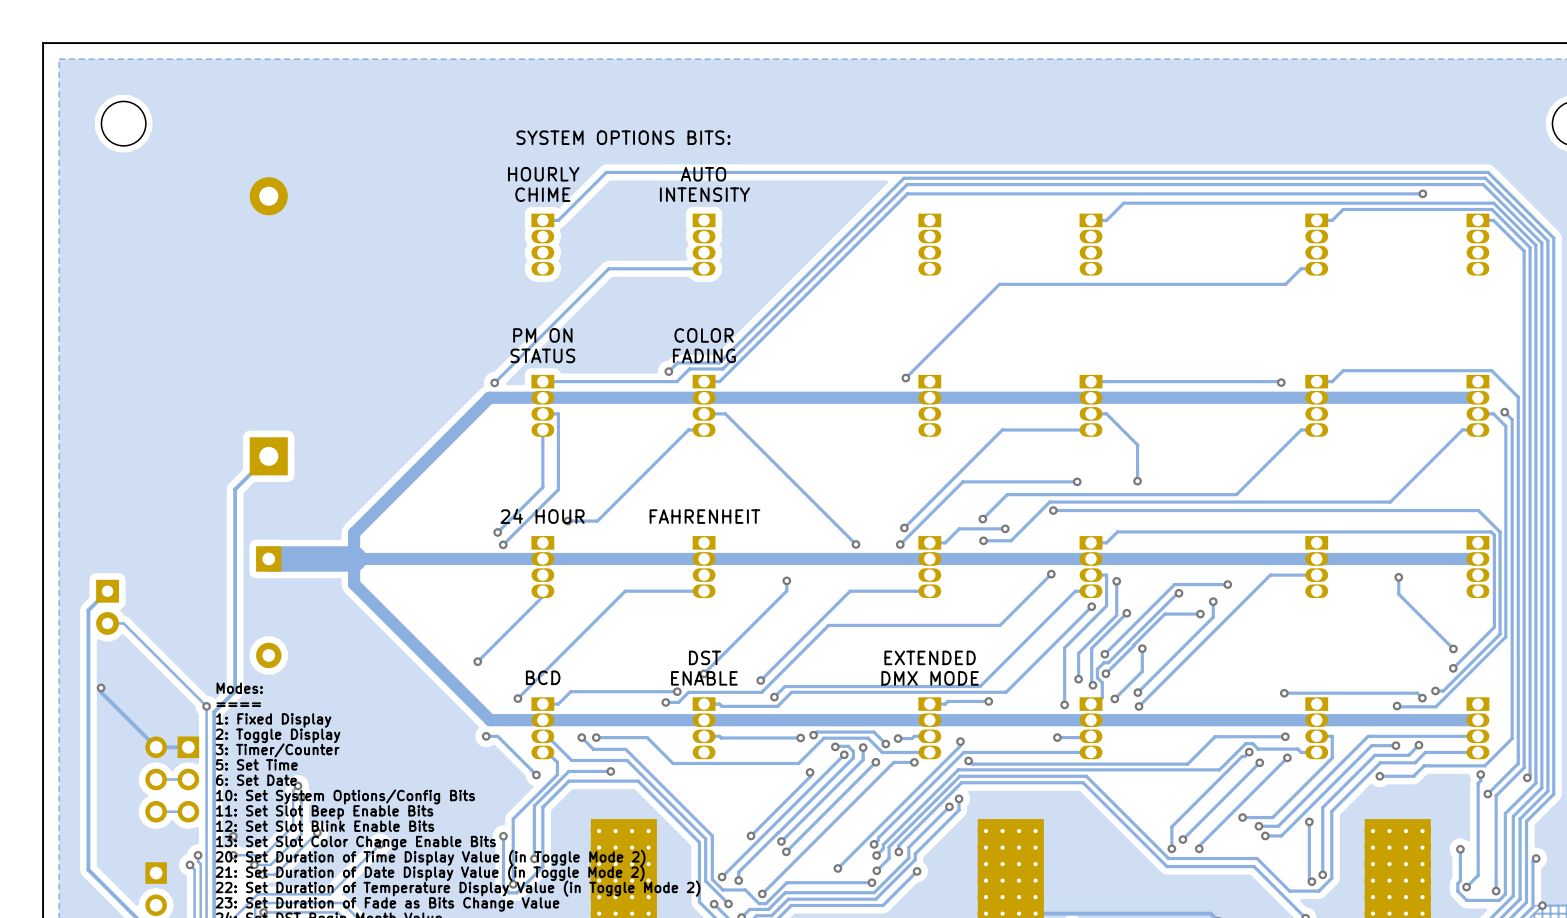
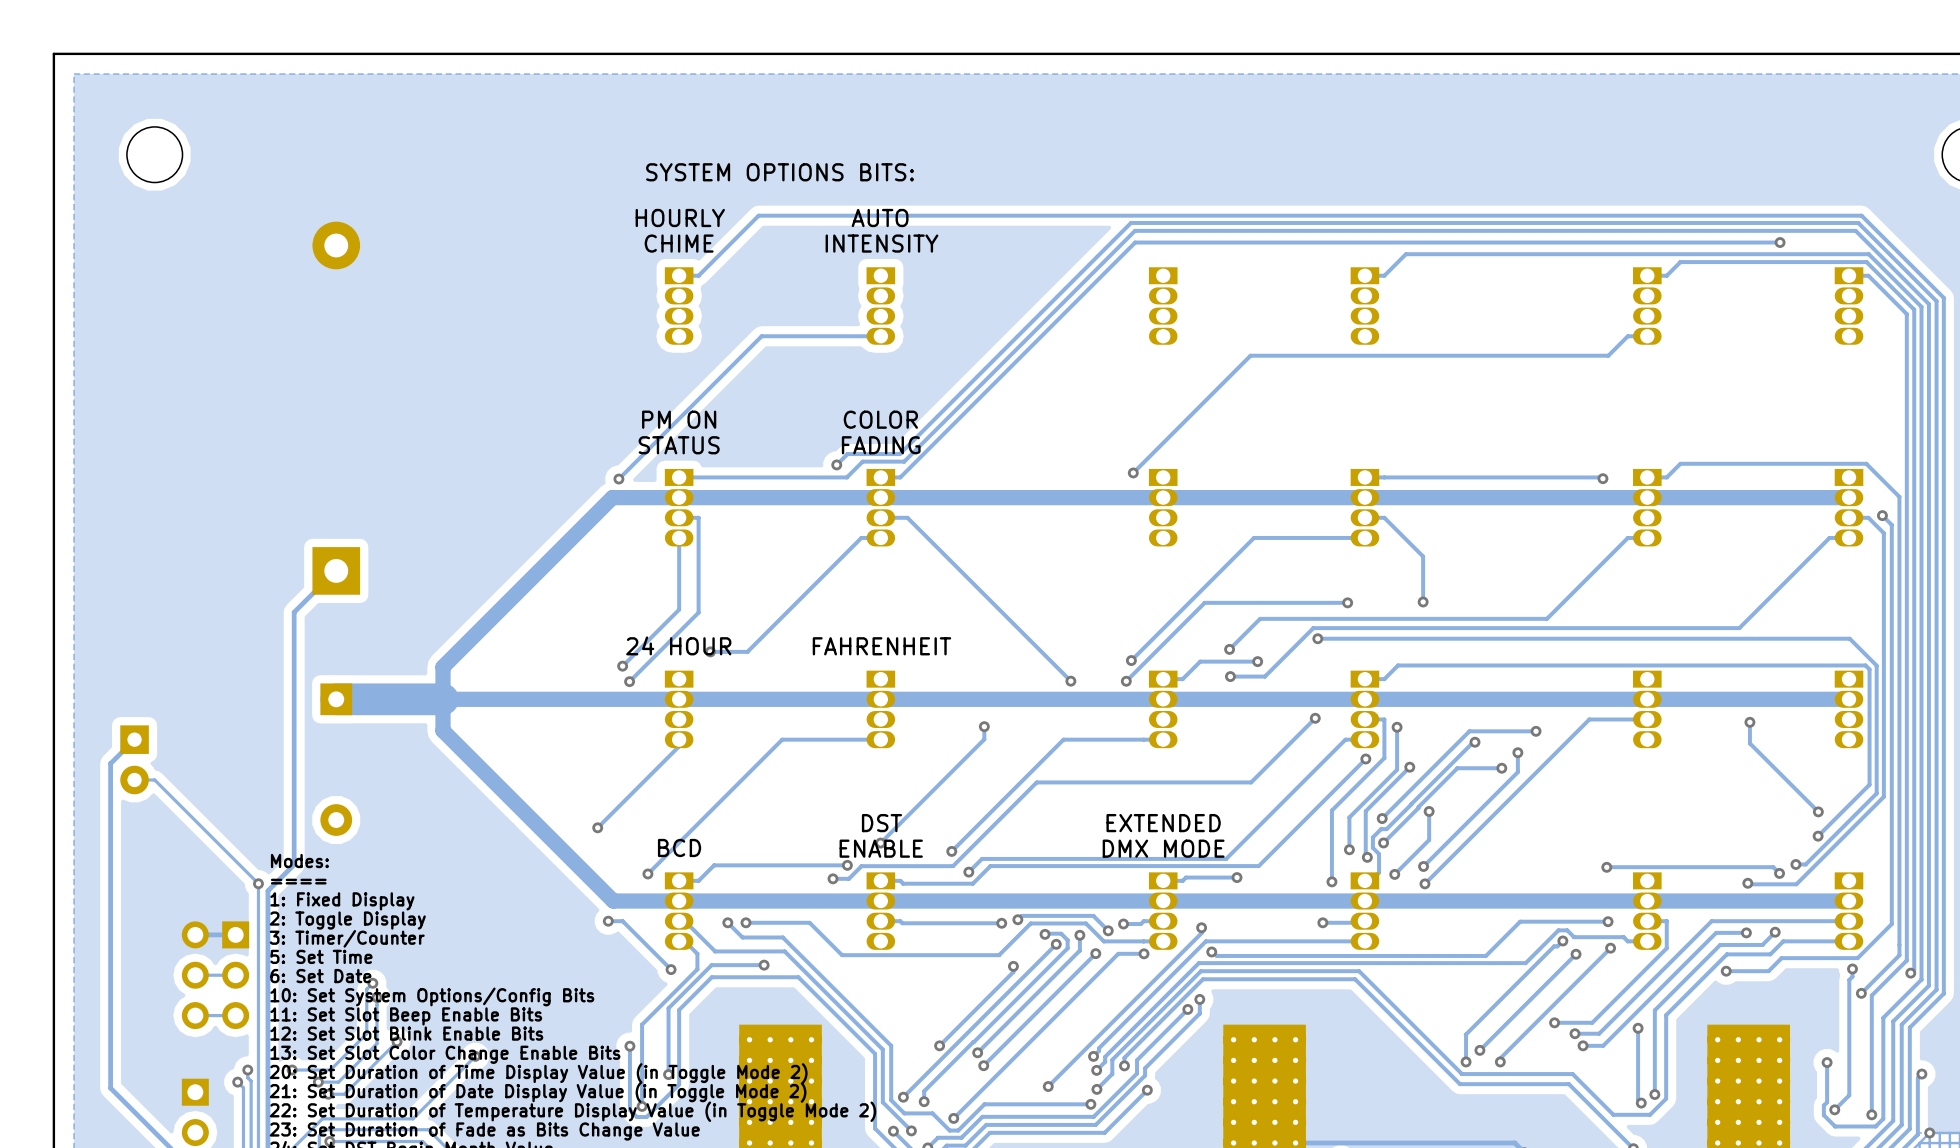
track: (101, 687) (101, 692) (156, 747) -> none
via: (101, 687) -> none
via: (233, 836) -> none

